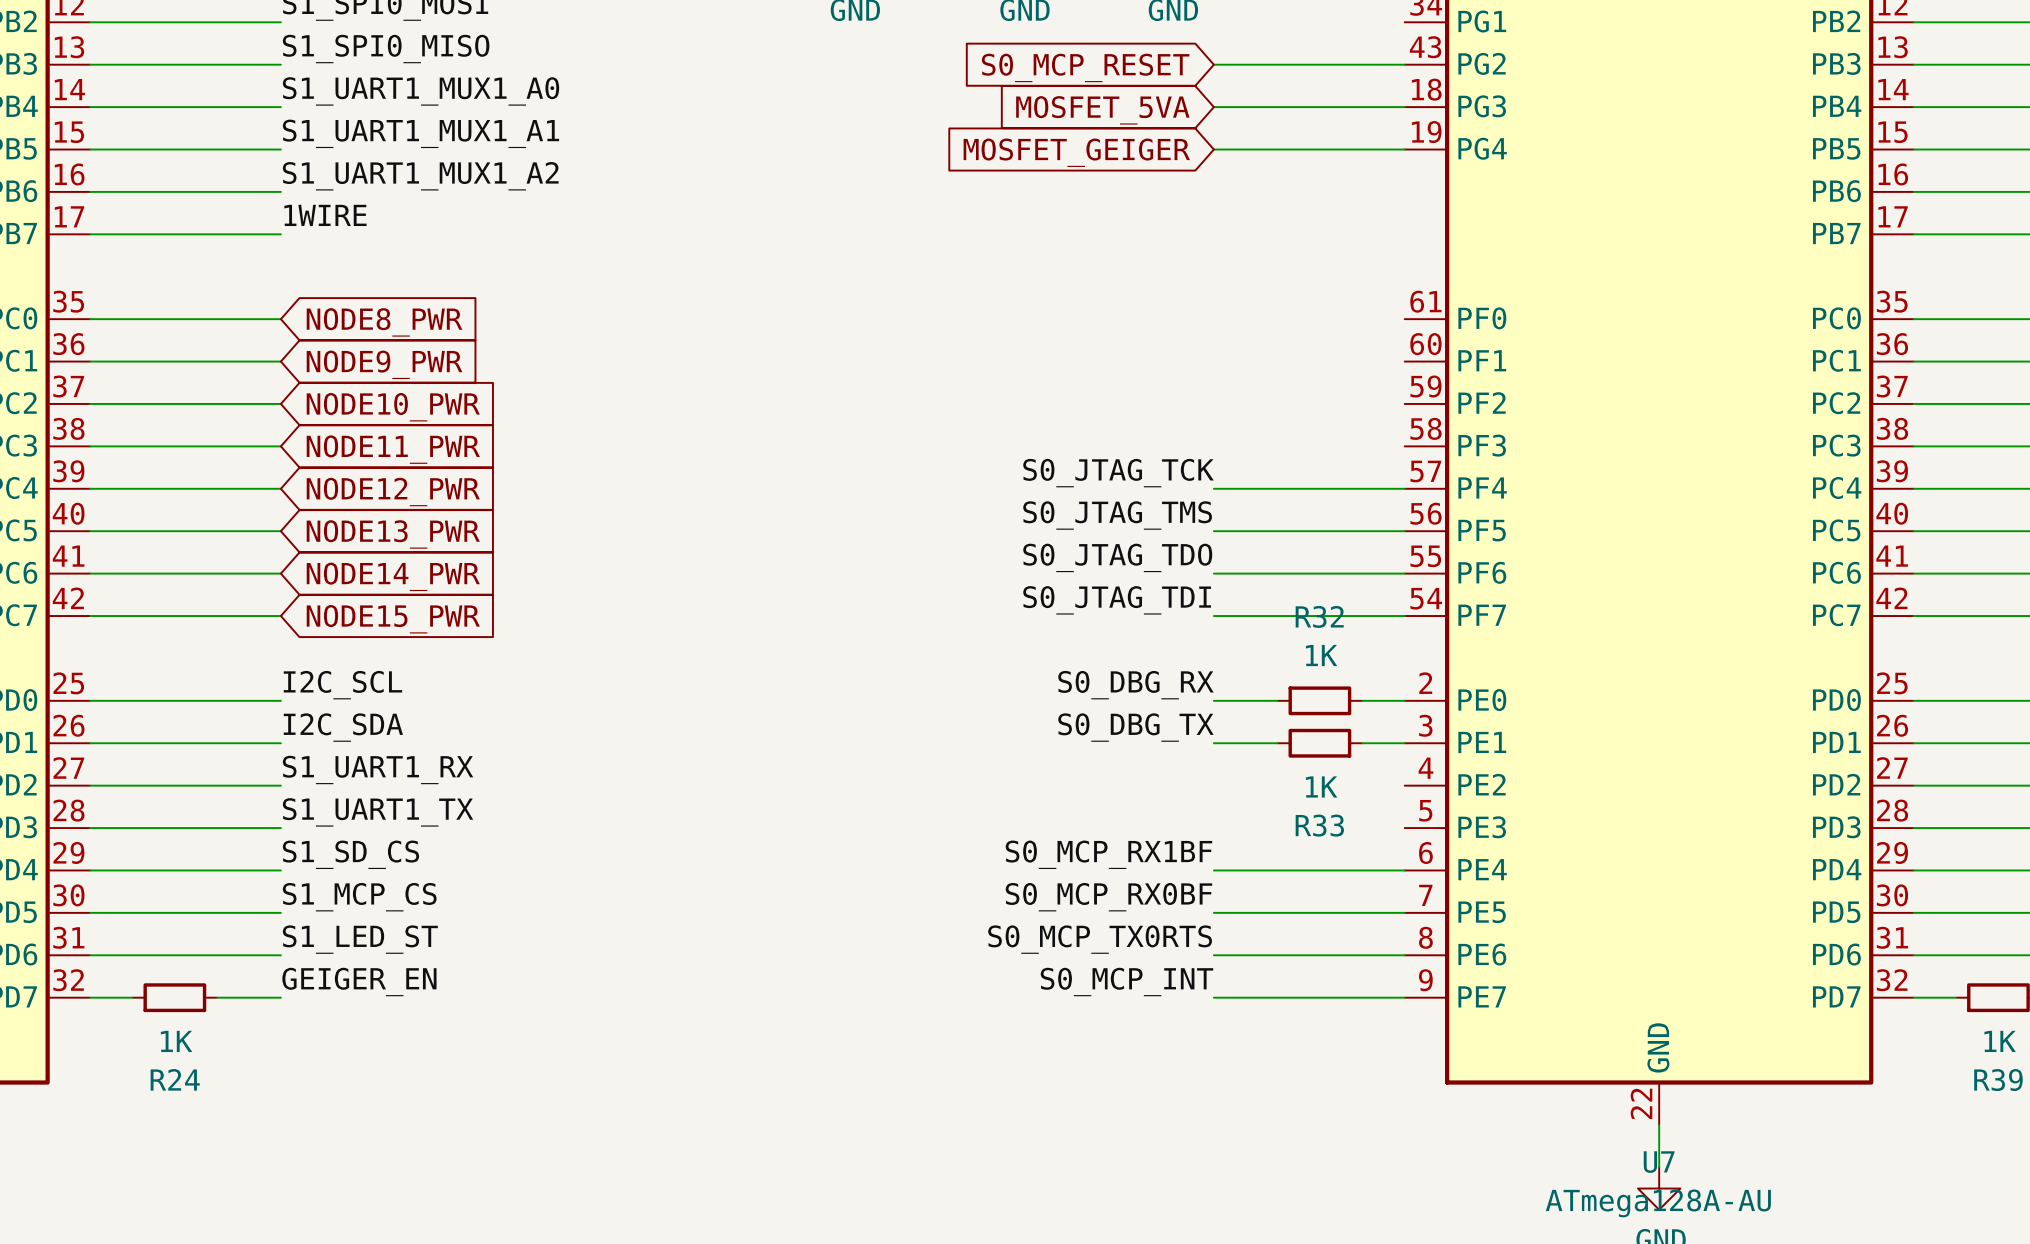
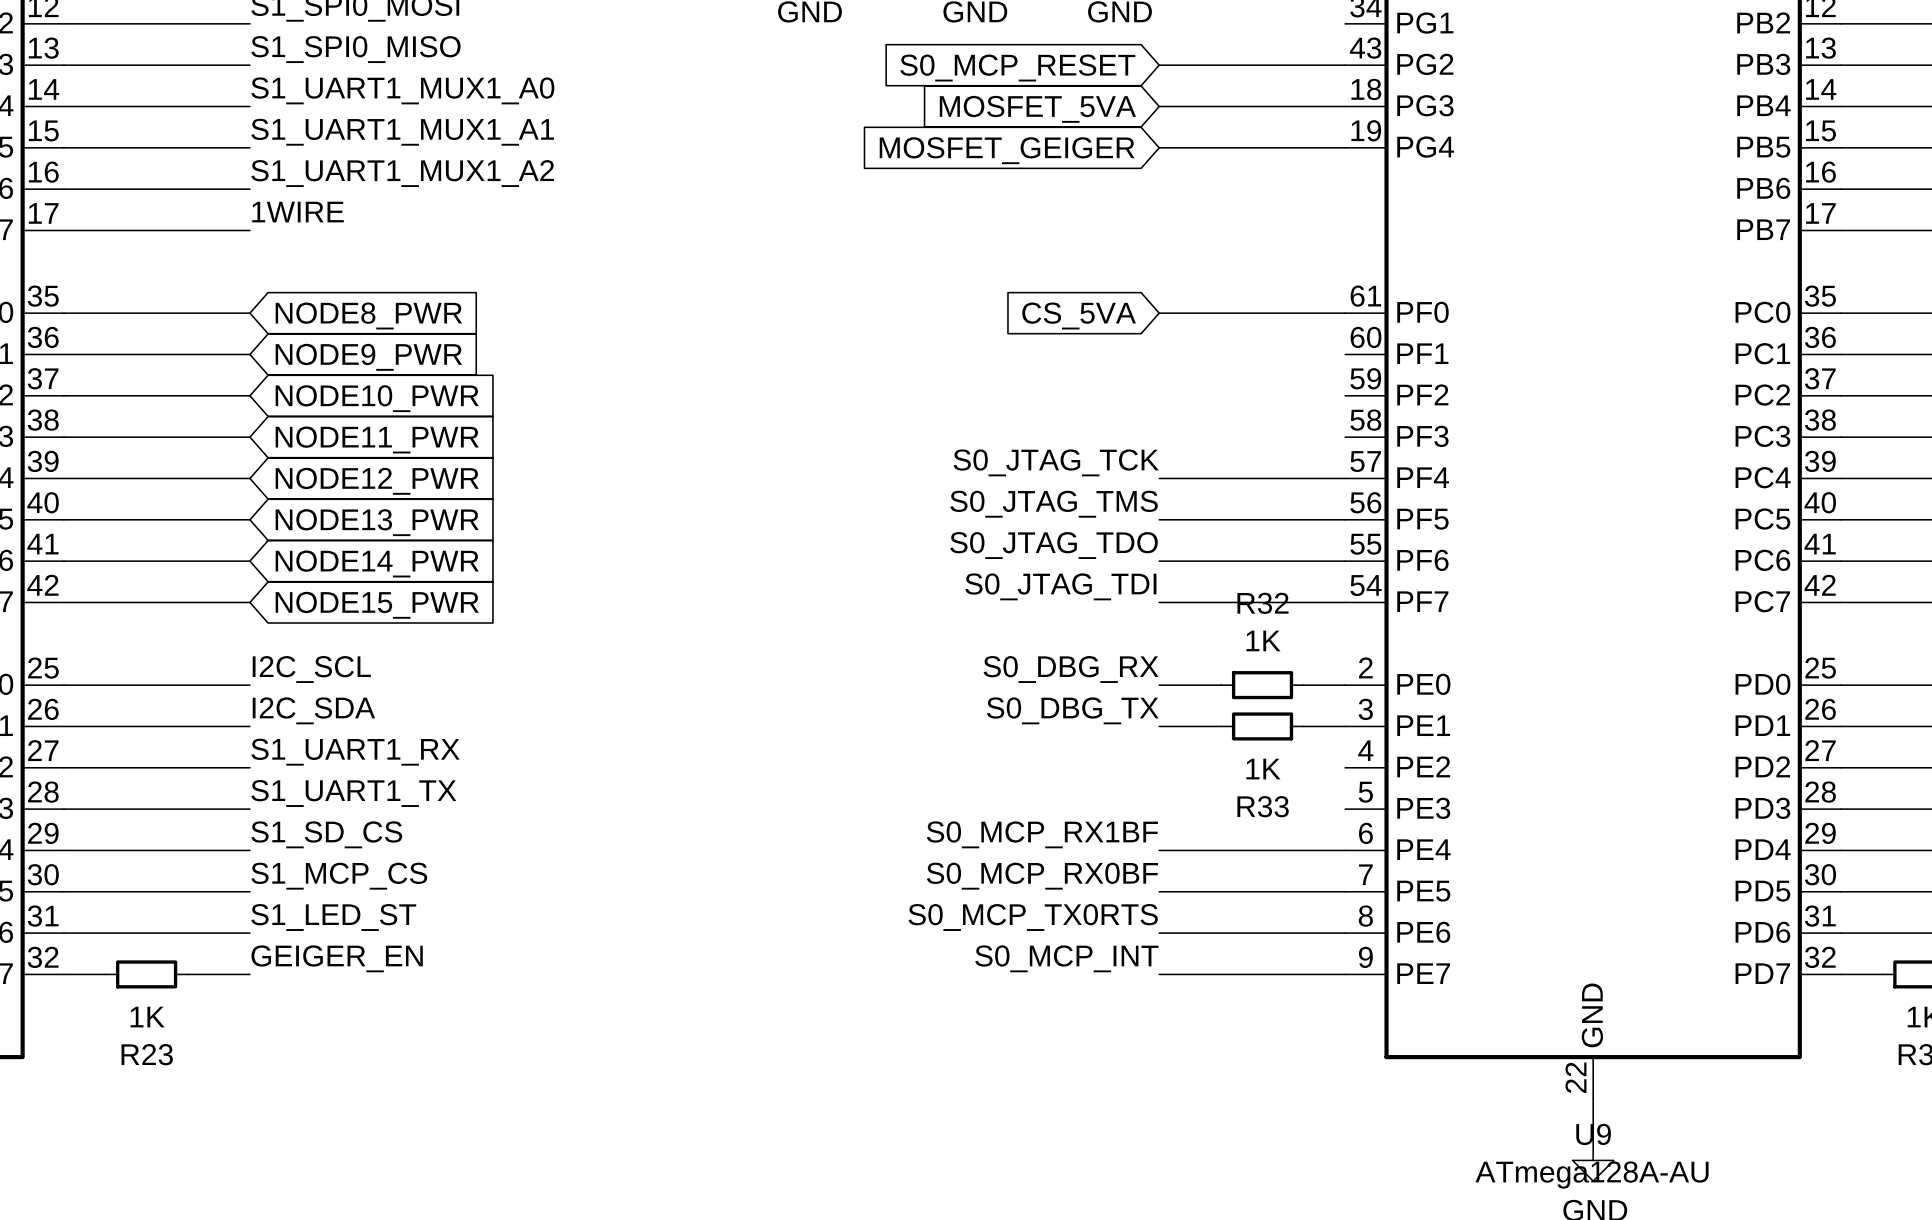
wire: none -> (1159, 313) (1345, 313)
global label: none -> CS_5VA (1079, 315)
R24 name: R24 (175, 1079) -> R23 (147, 1054)
U7 name: U7 (1659, 1162) -> U9 (1593, 1134)

